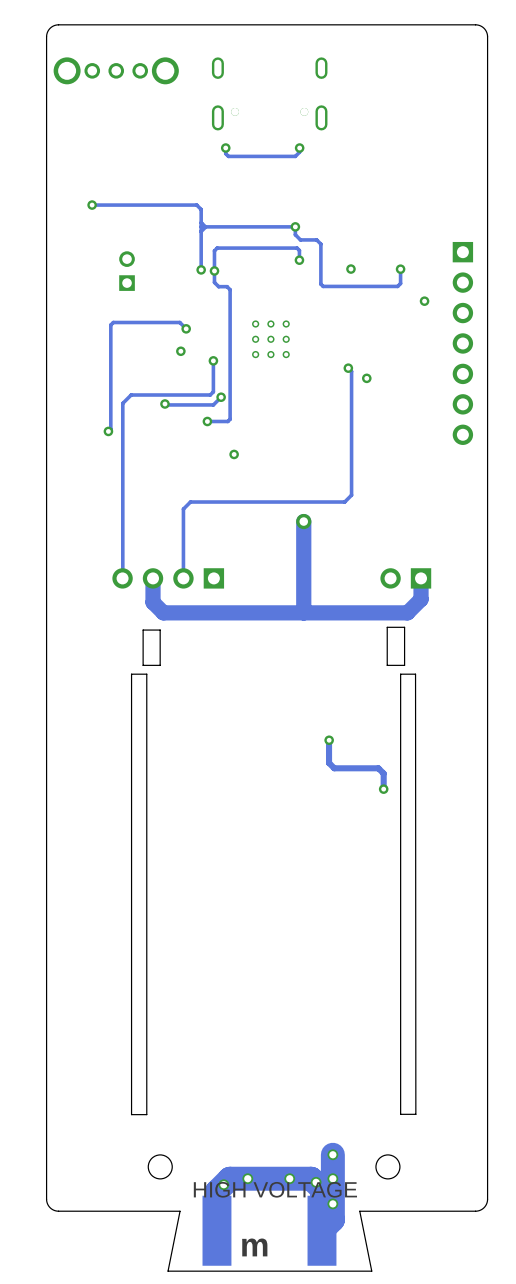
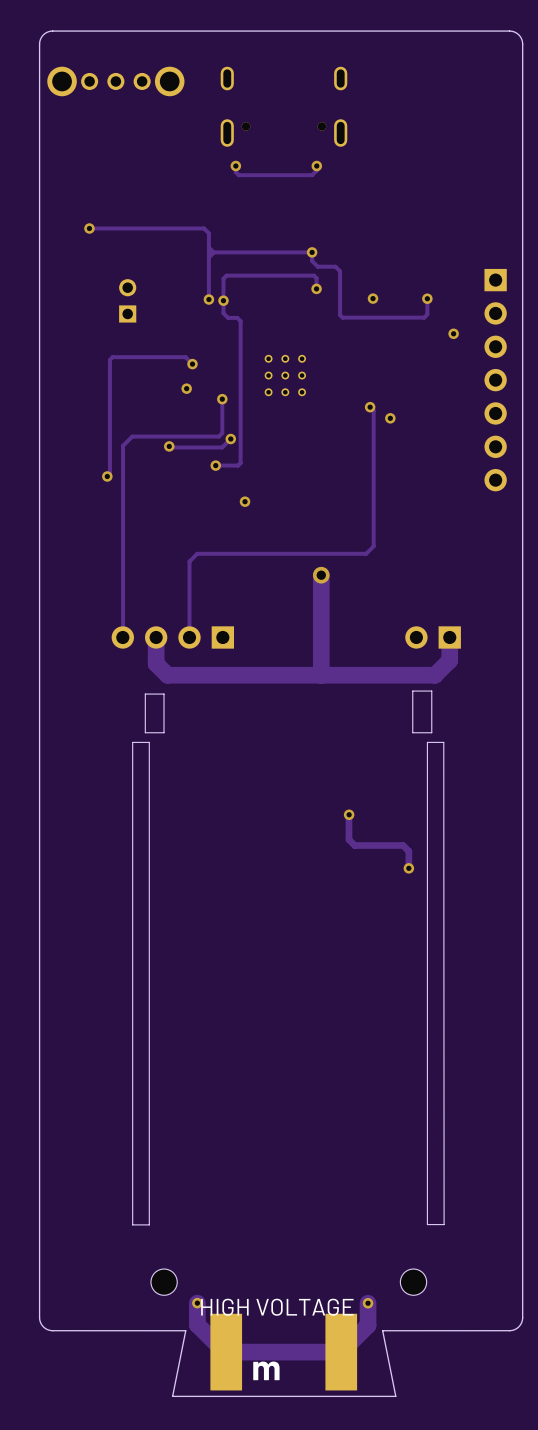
track: (332, 1154) (332, 1219) -> (368, 1303) (368, 1325) (353, 1340)
via: (332, 1154) -> none
via: (247, 1178) -> none
via: (289, 1178) -> none
via: (332, 1178) -> none
via: (316, 1182) -> none
via: (223, 1184) -> none
via: none -> (197, 1303)
via: none -> (368, 1303)
via: (332, 1203) -> none
track: (321, 1230) (321, 1189) (311, 1178) (229, 1178) (216, 1191) (216, 1230) -> (341, 1352) (224, 1352) (197, 1324) (197, 1303)

